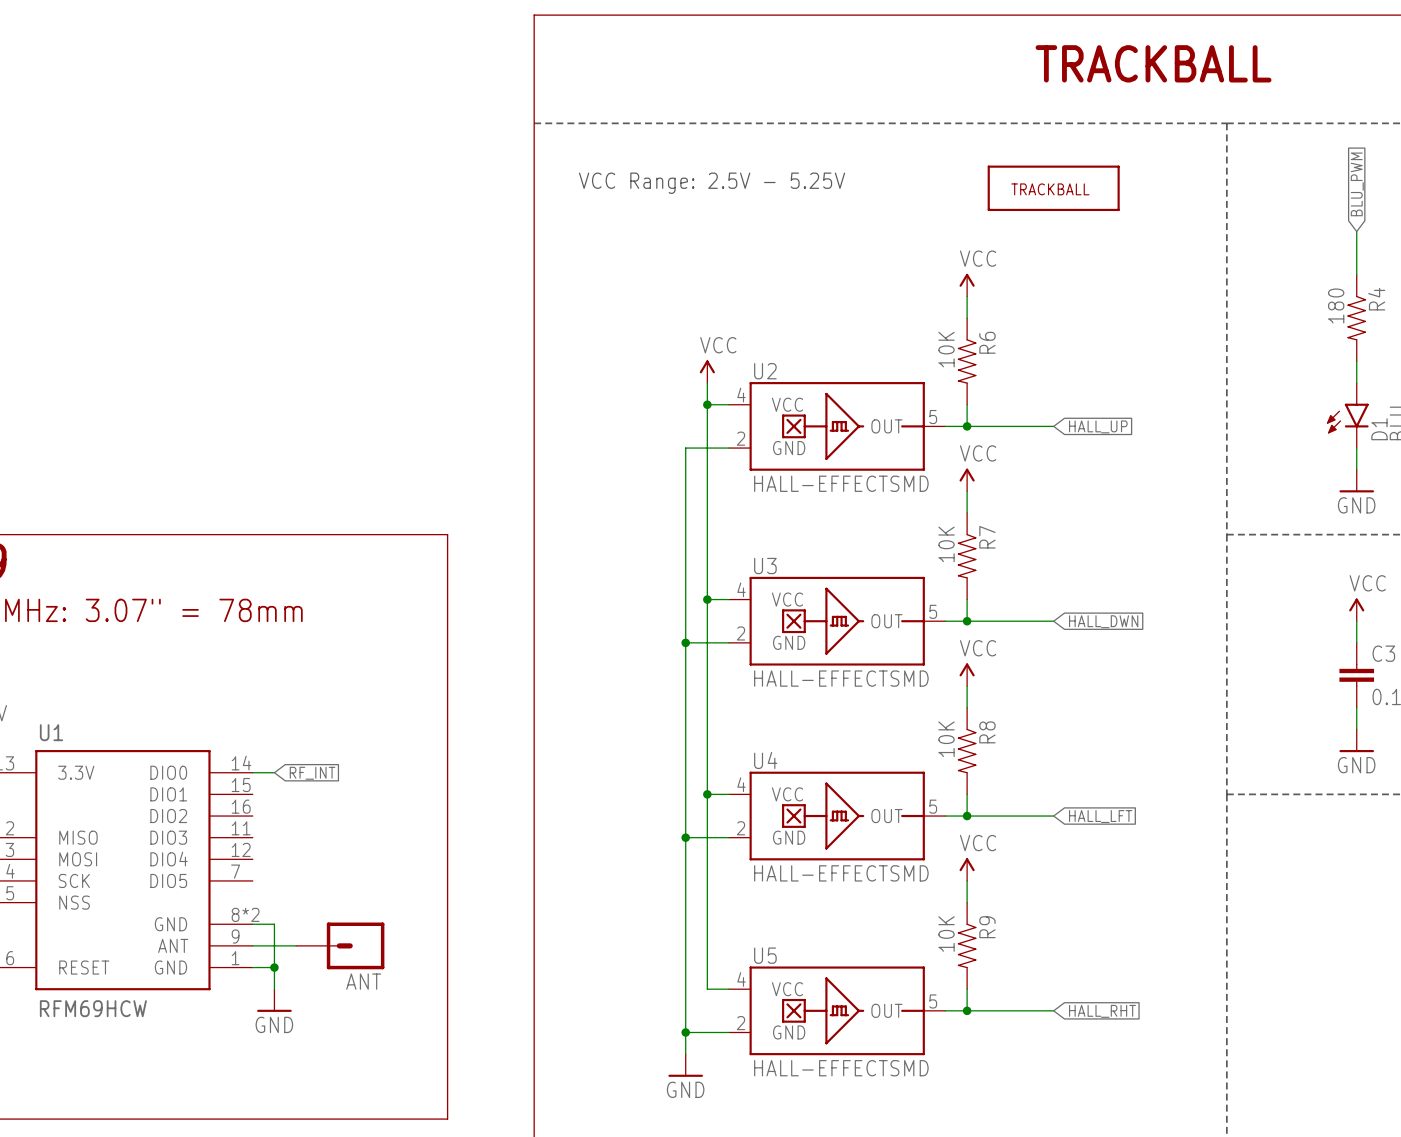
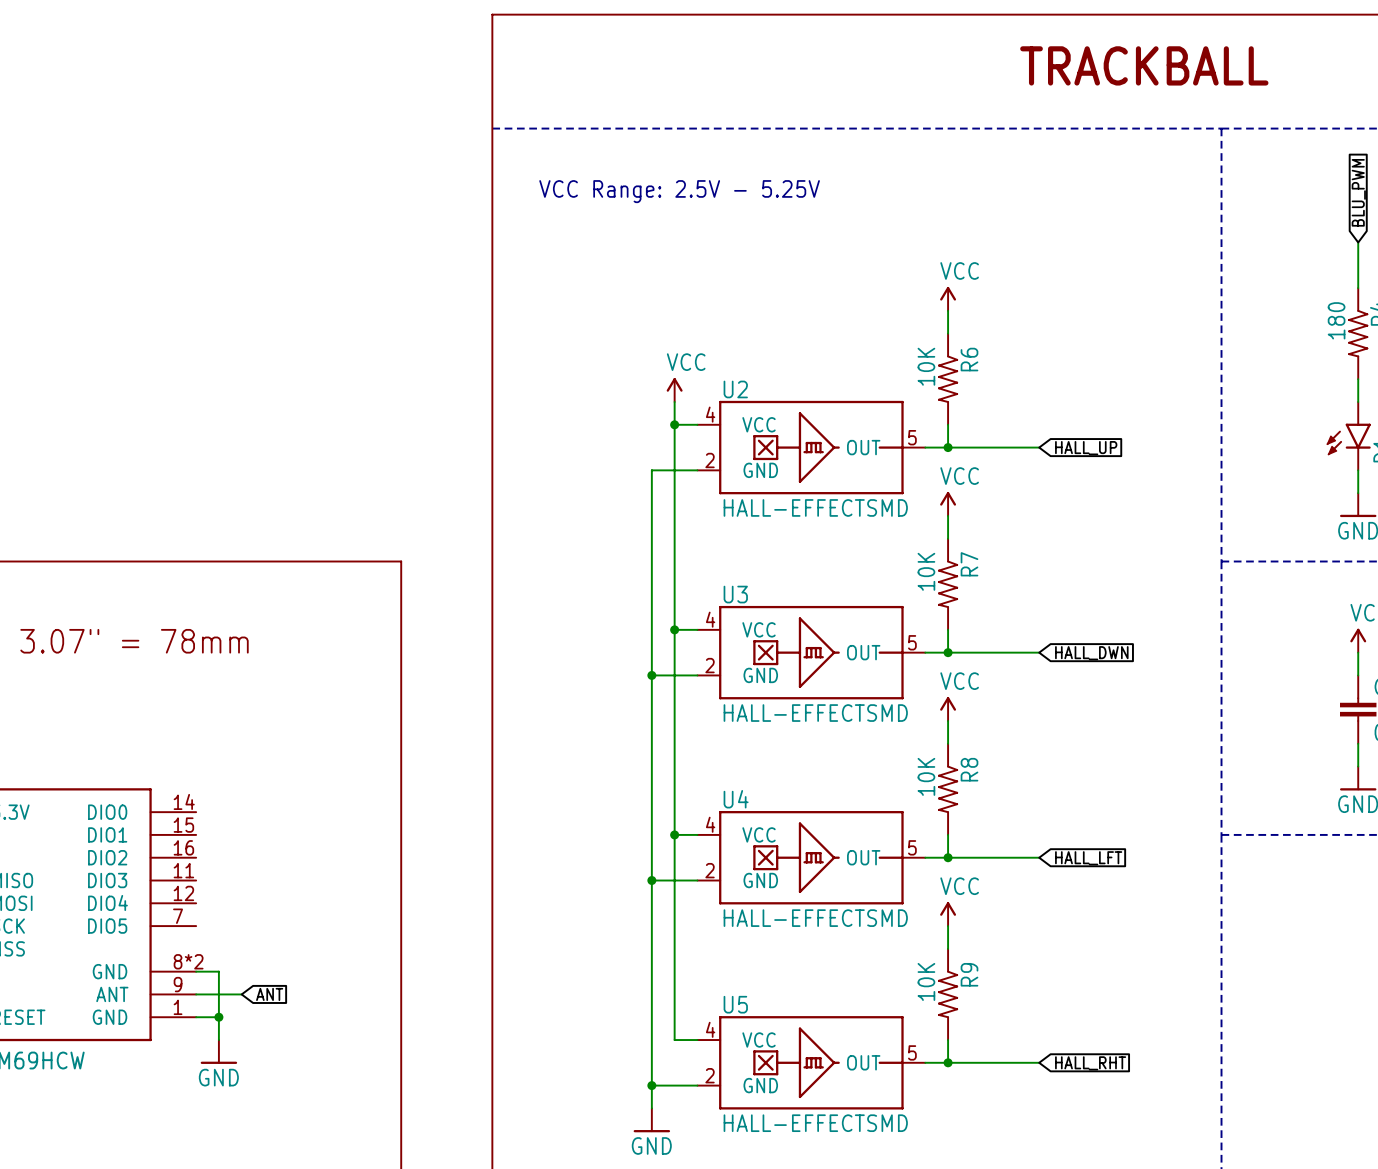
part: (1053, 188) -> none
wire: (252, 772) (274, 772) -> none
global label: RF_INT (312, 773) -> none
global label: none -> ANT (269, 994)
ANT: (340, 945) -> none

